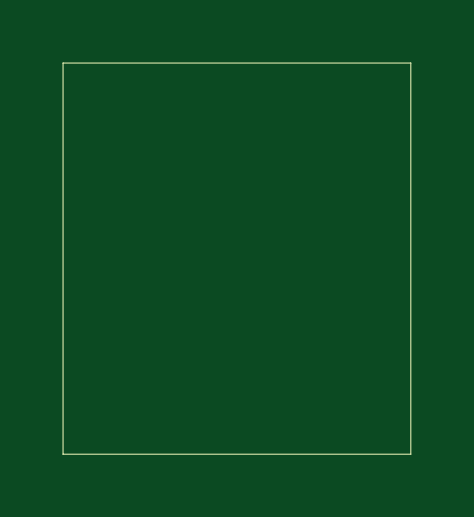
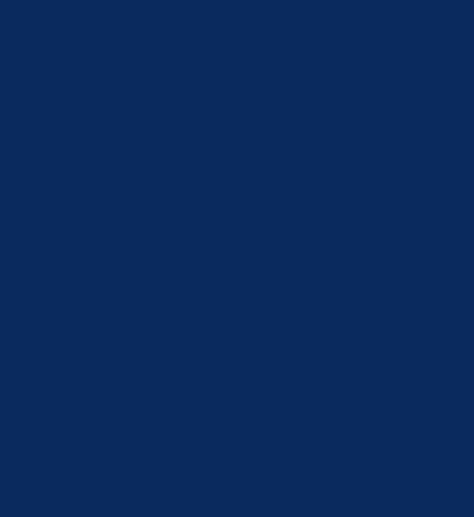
board edge: (410, 63) (63, 63) (63, 454) (410, 454) (410, 63) -> none

